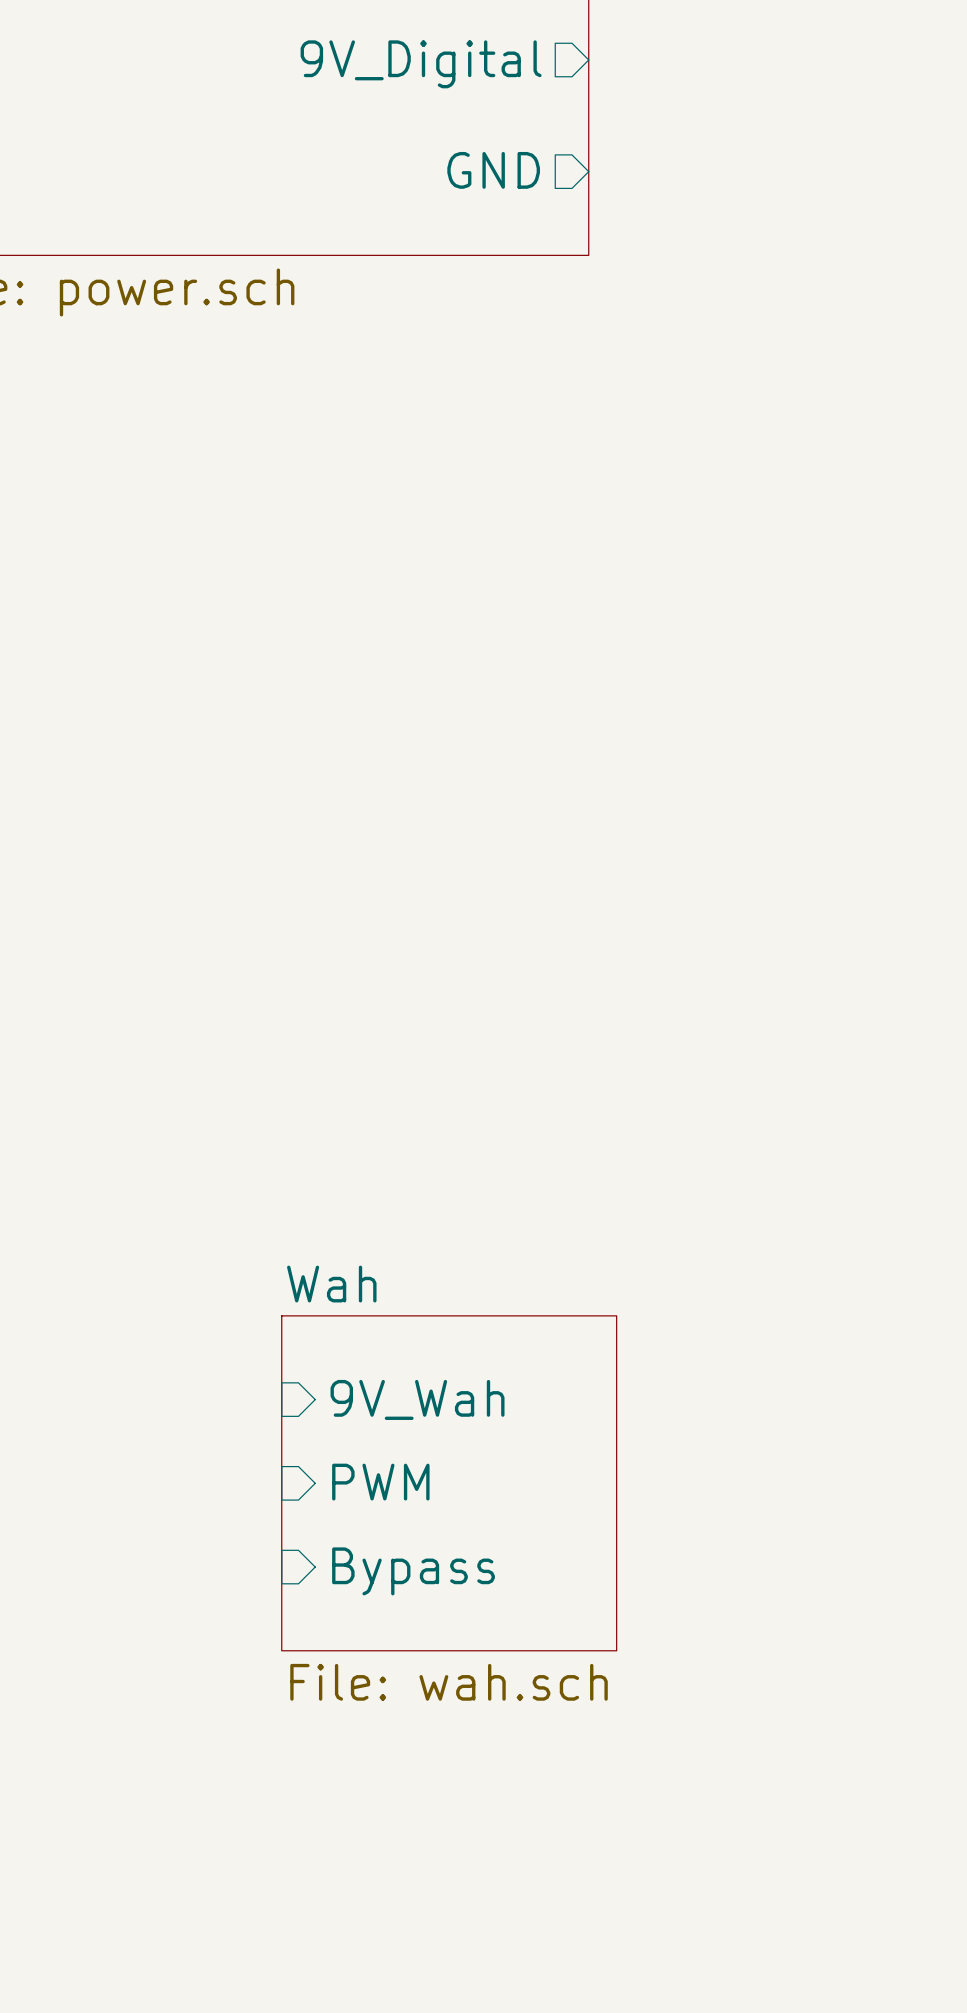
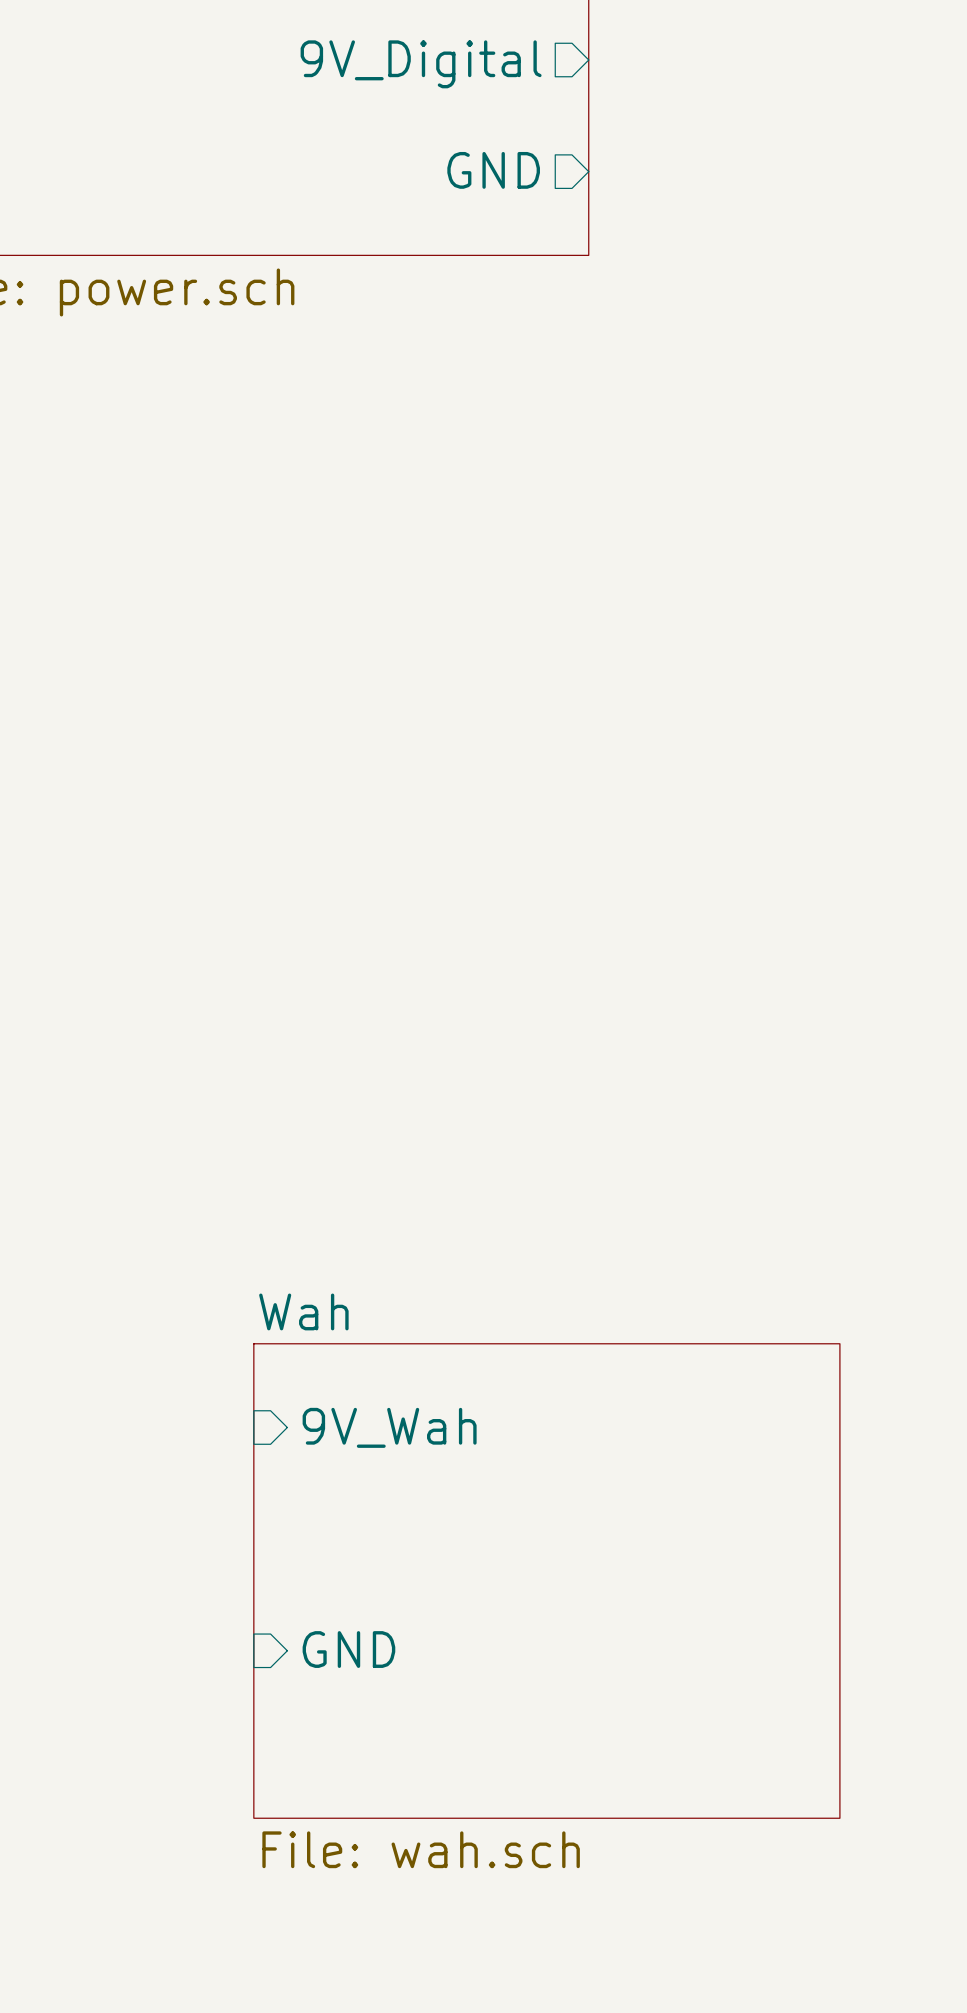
sheet pin position: 9V_Wah (417, 1399) -> 9V_Wah (389, 1427)
sheet pin: PWM (380, 1482) -> none
sheet Wah: File: wah.sch (449, 1483) -> none
sheet pin: Bypass (413, 1571) -> none
sheet Wah: none -> File: wah.sch (546, 1581)
sheet pin: none -> GND (348, 1649)

